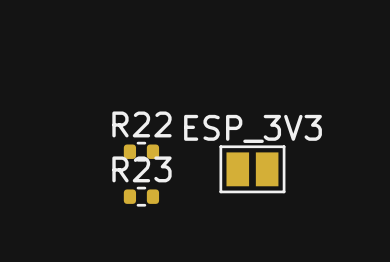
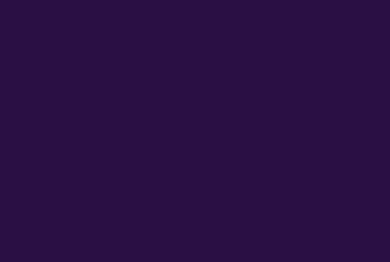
R22: (141, 151) -> none
ESP_3V3: (252, 169) -> none
R23: (141, 196) -> none

